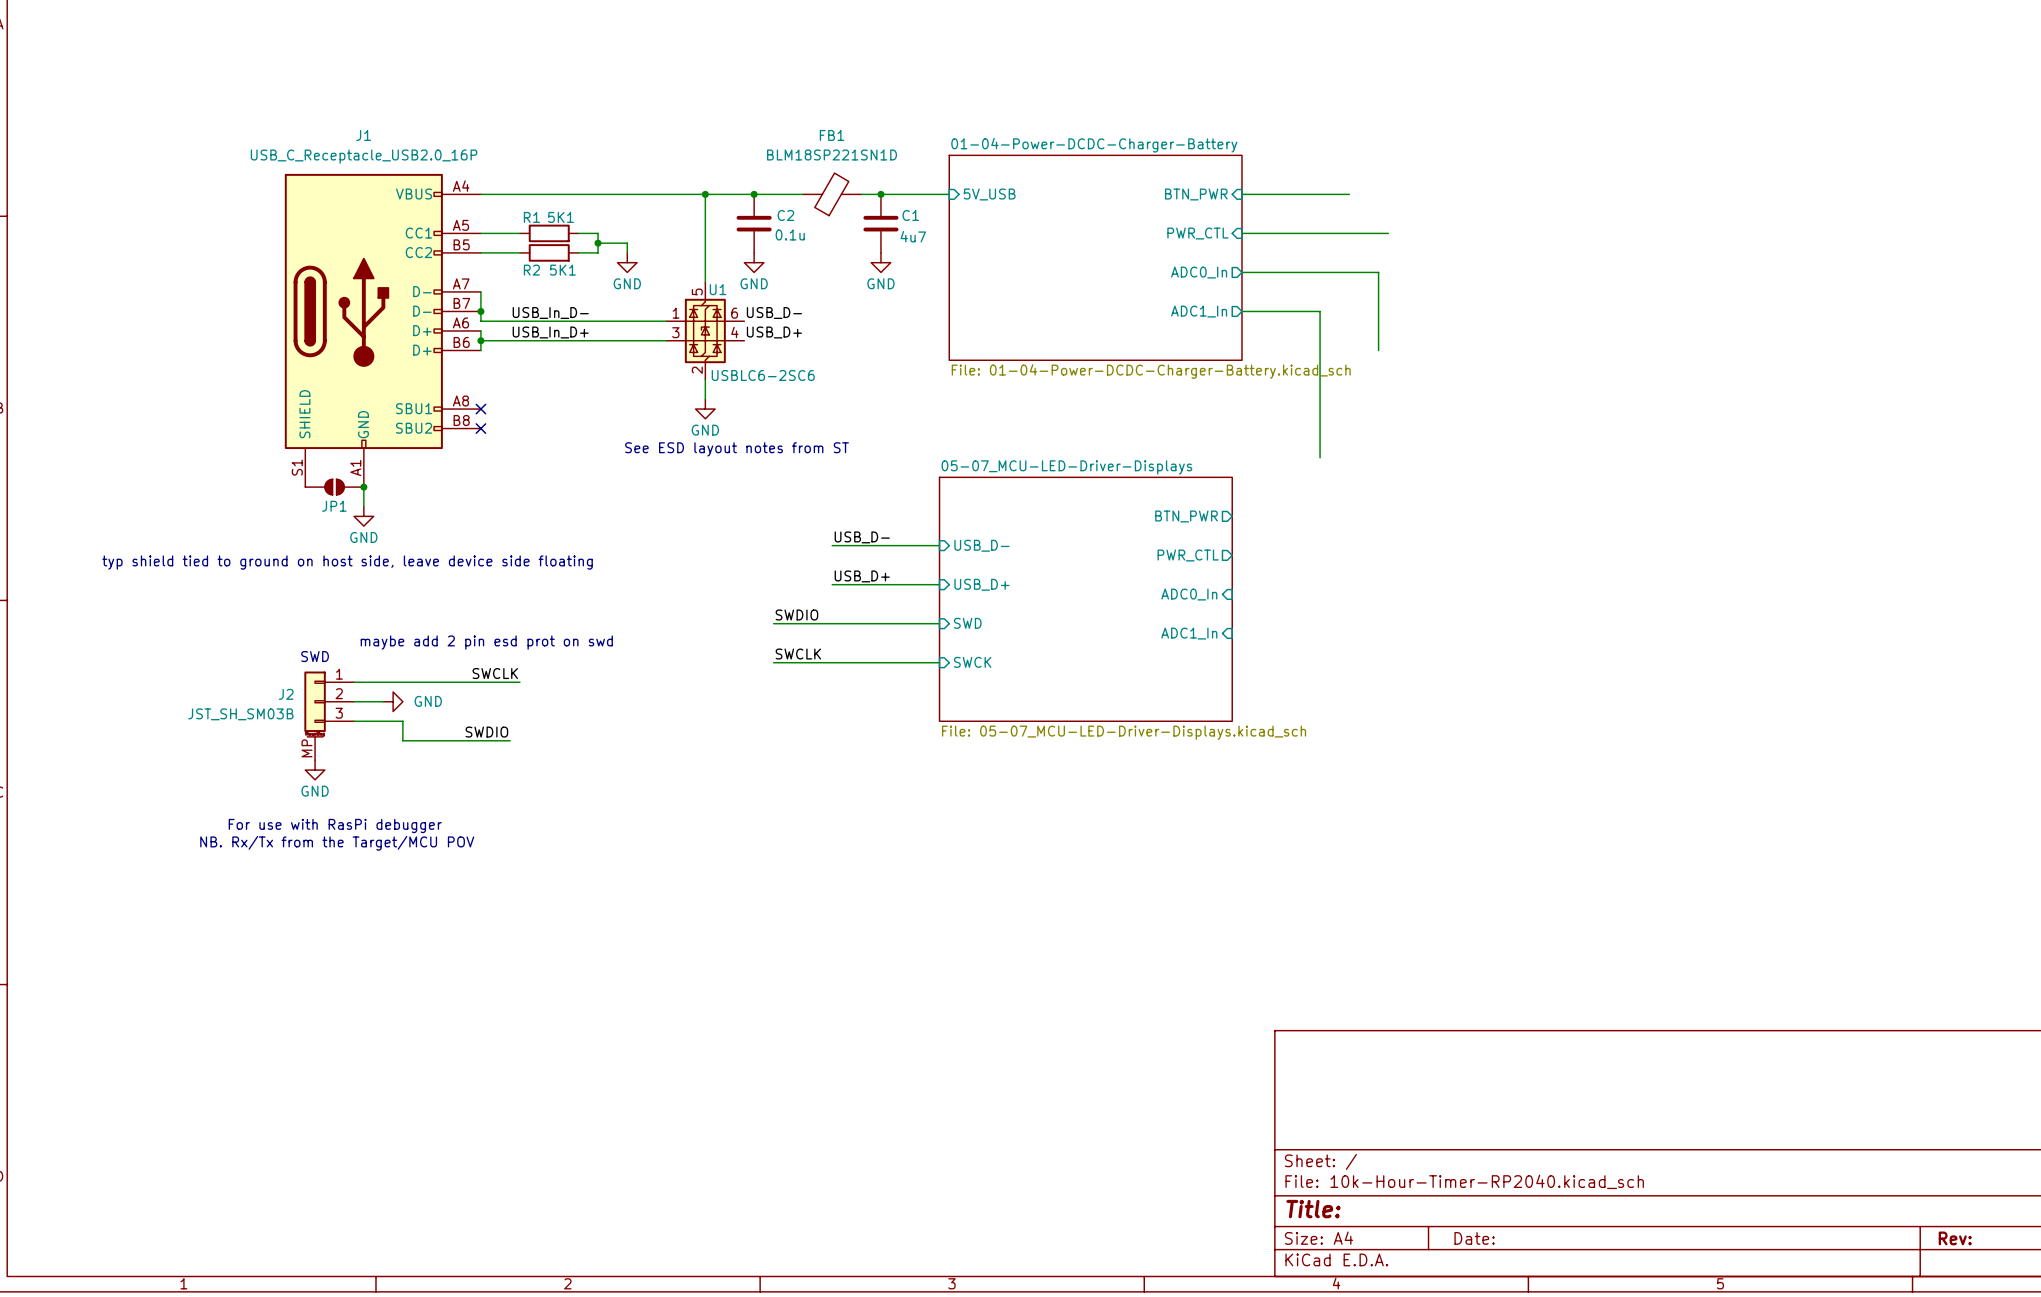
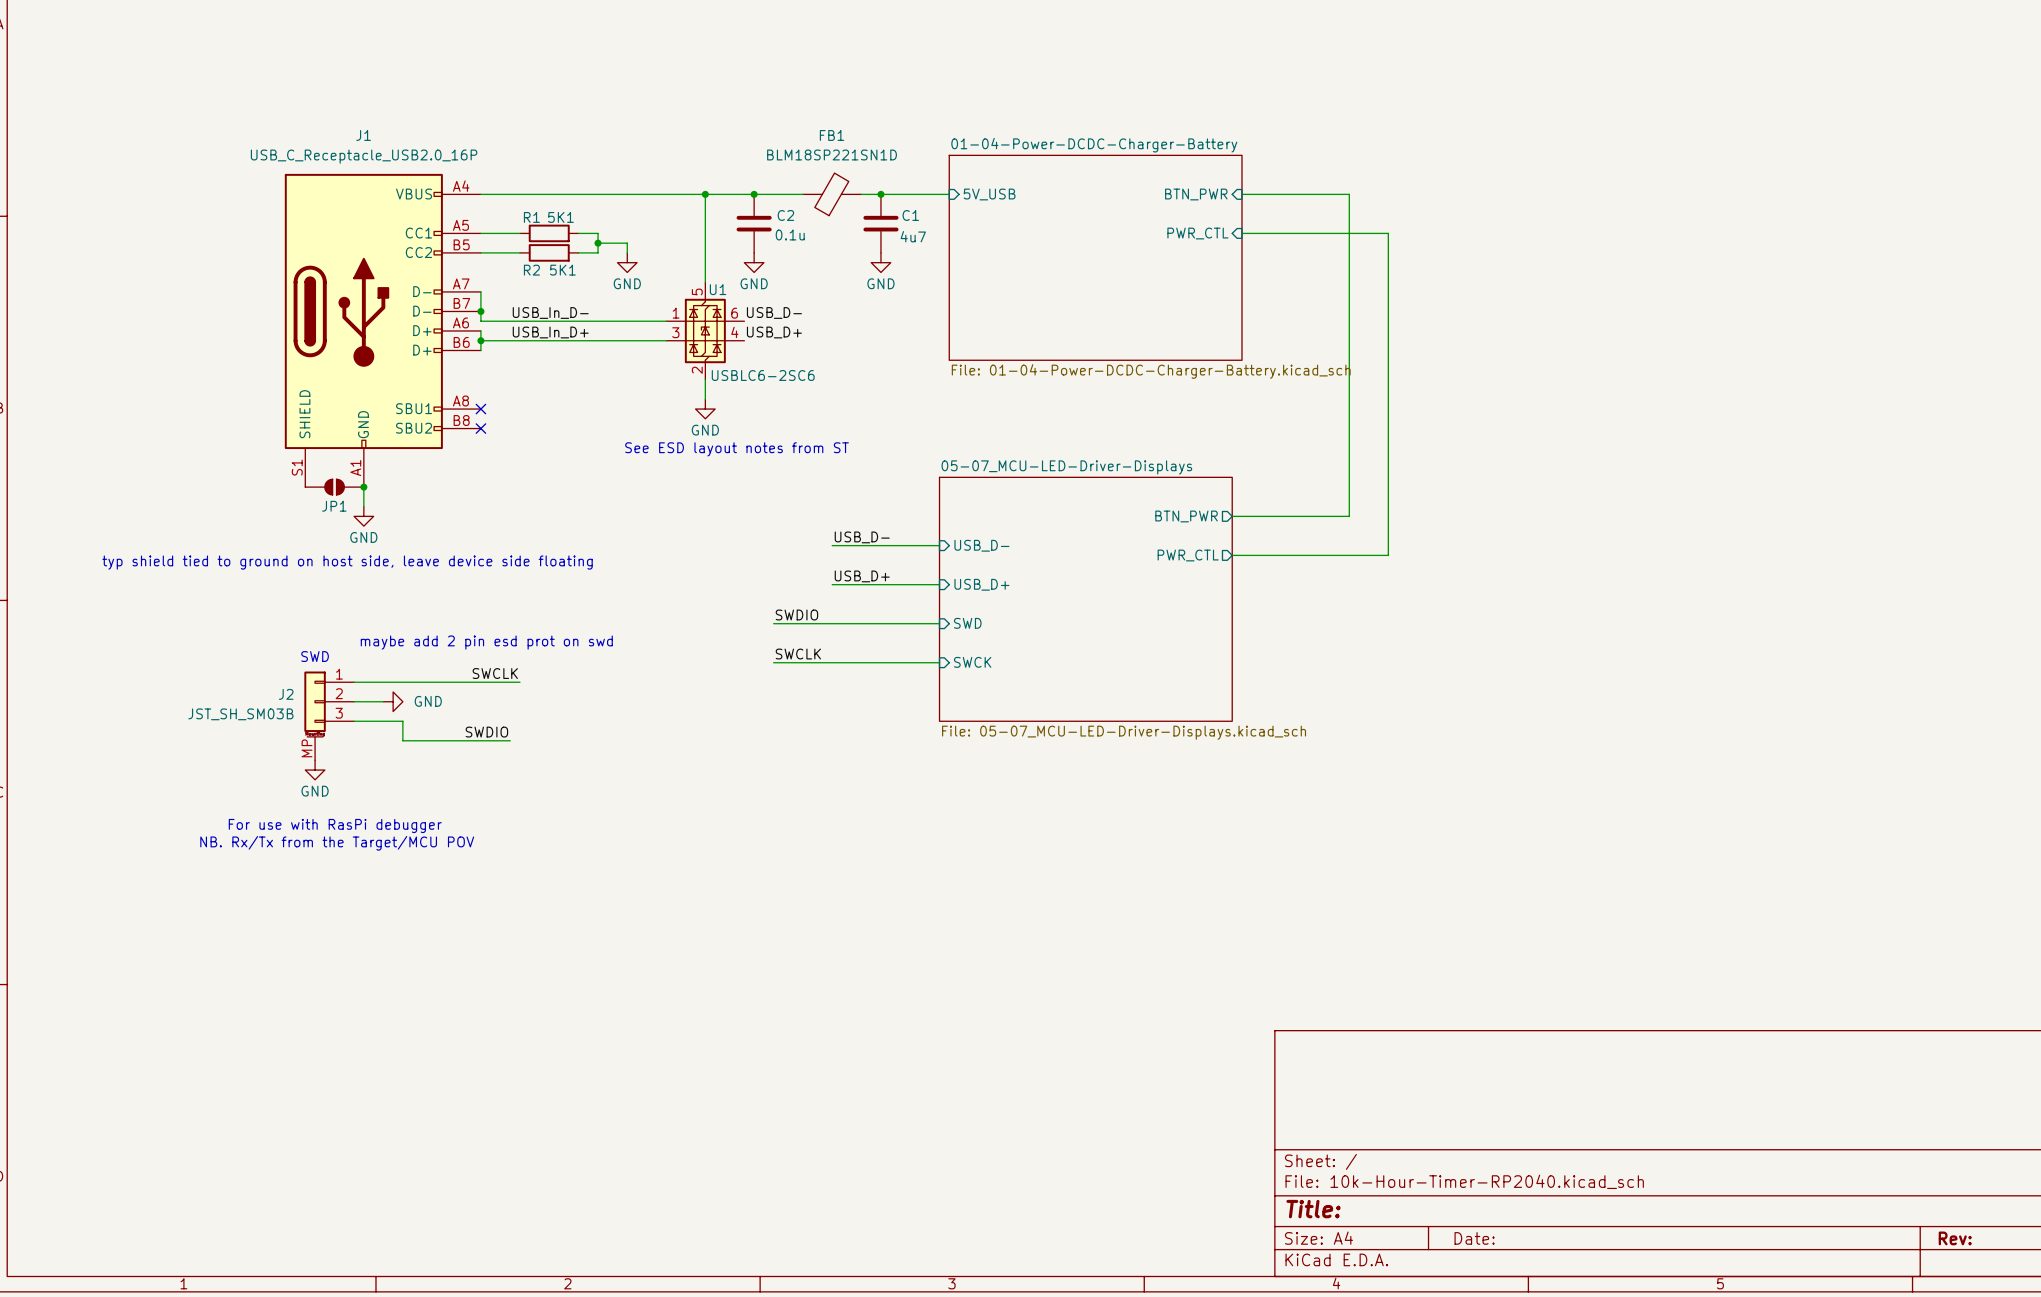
wire: none -> (1349, 194) (1349, 516) (1232, 516)
wire: none -> (1388, 233) (1388, 555) (1232, 555)
sheet pin: ADC0_In (1199, 272) -> none
wire: (1241, 272) (1378, 272) (1378, 350) -> none
sheet pin: ADC1_In (1199, 311) -> none
wire: (1241, 311) (1320, 311) (1320, 457) -> none
sheet pin: ADC0_In (1189, 594) -> none
sheet pin: ADC1_In (1189, 633) -> none

